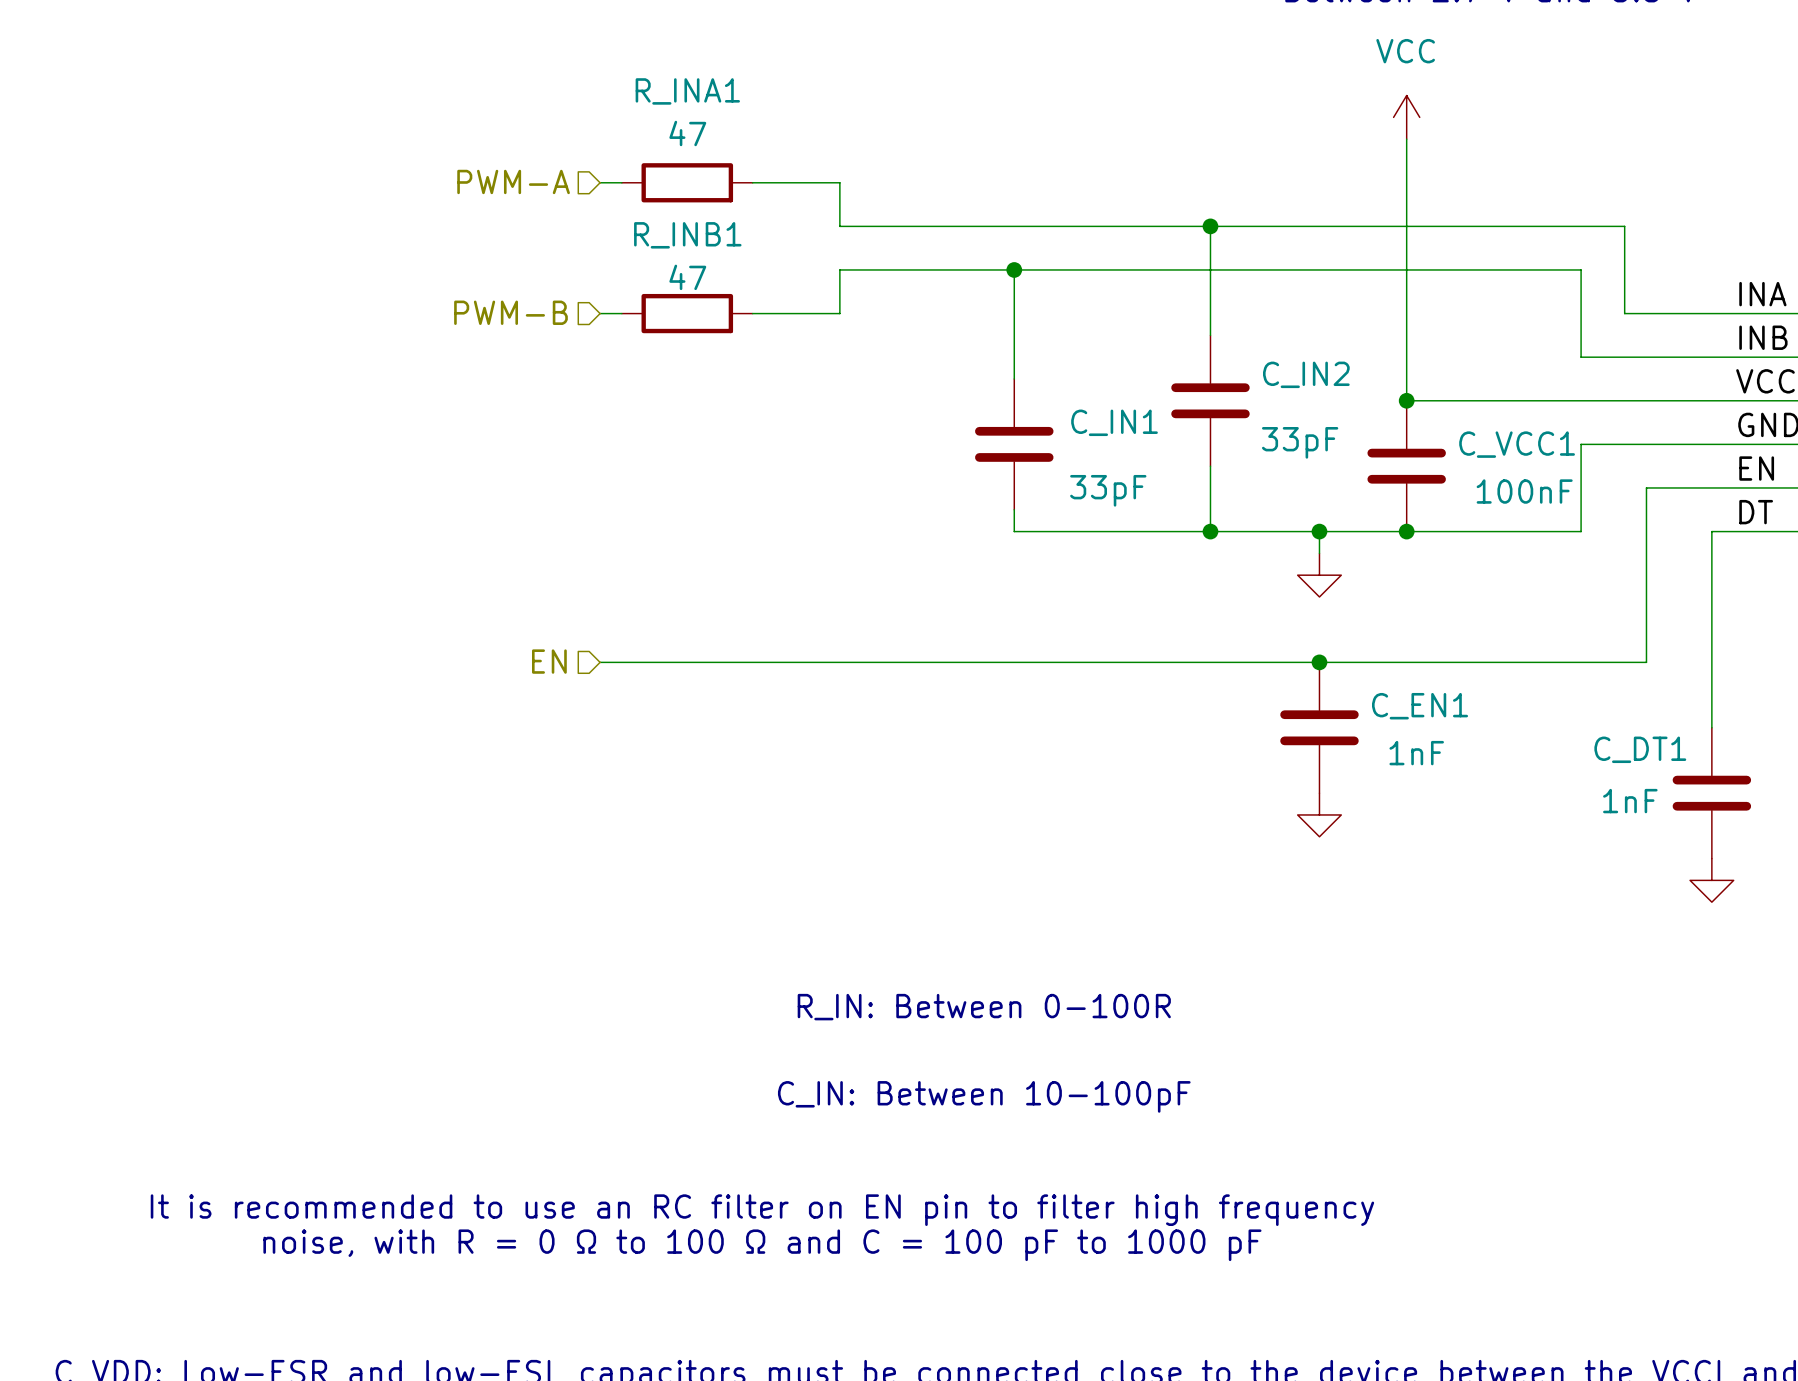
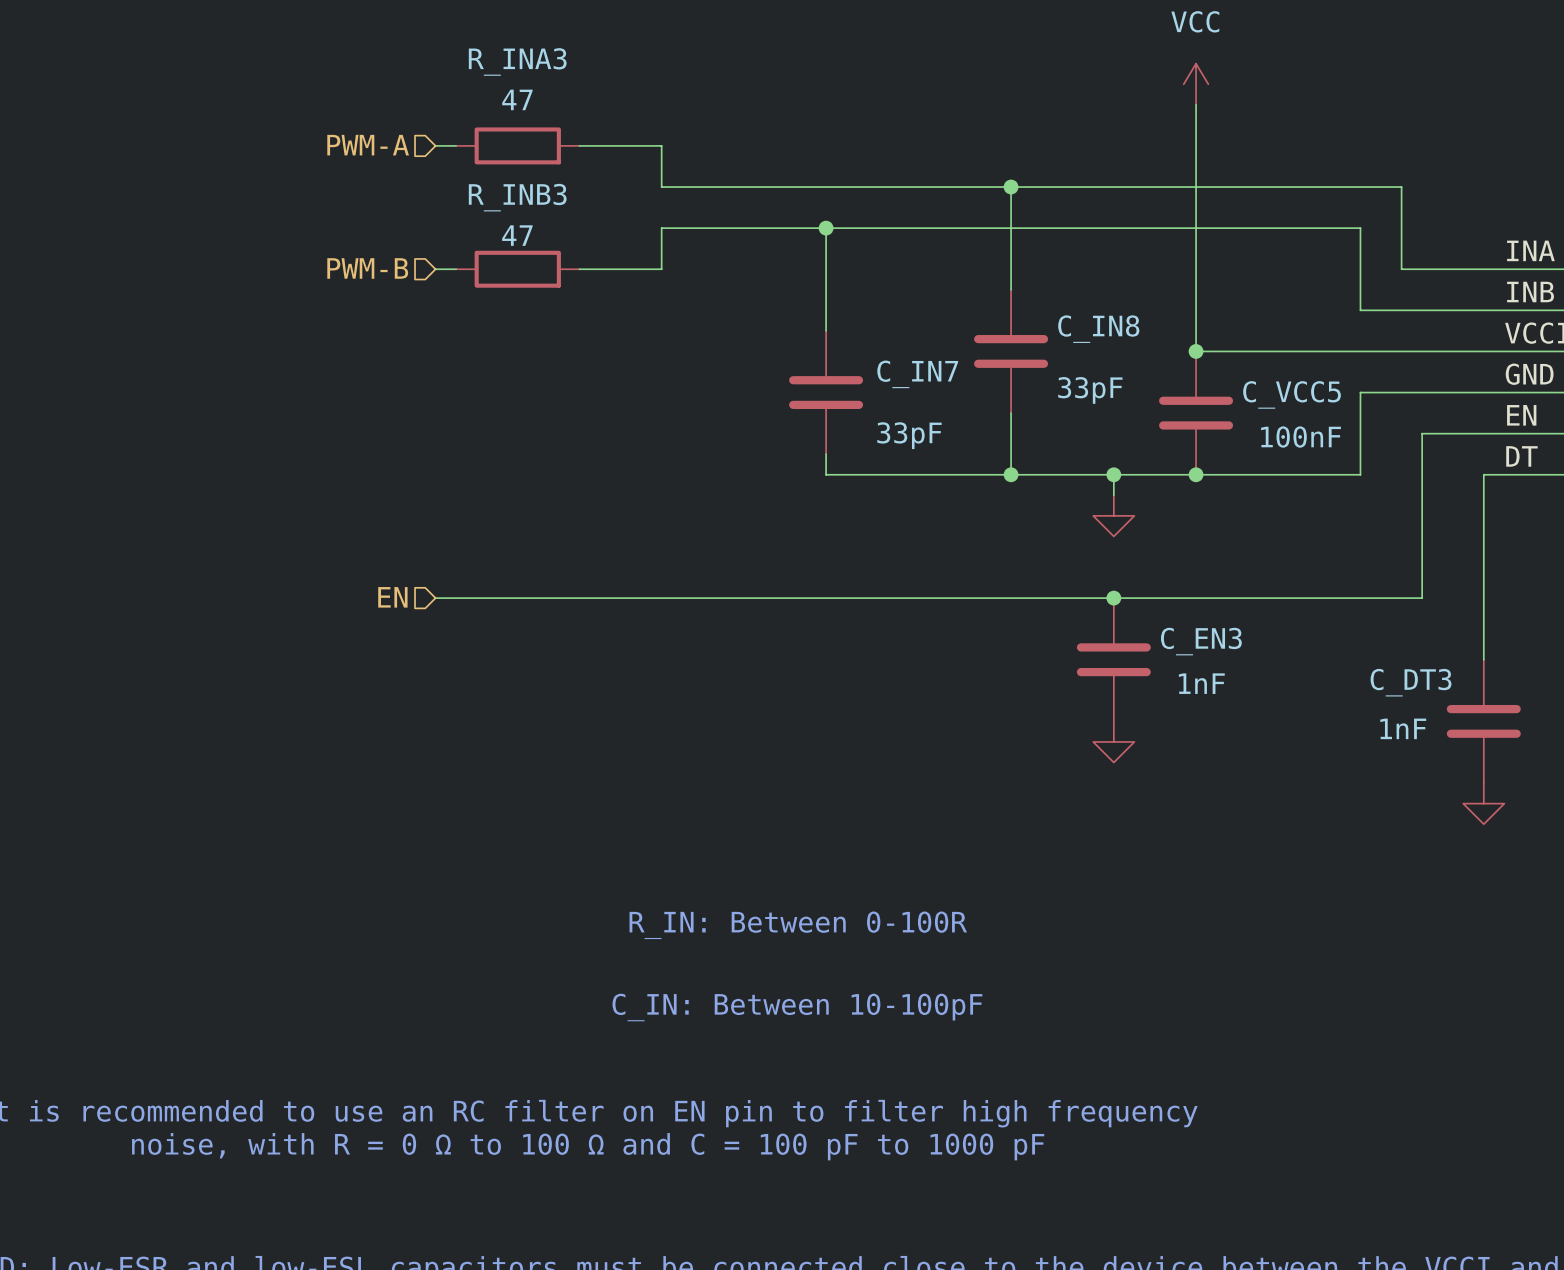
R_INA1 name: R_INA1 (687, 91) -> R_INA3 (517, 61)
R_INB1 name: R_INB1 (687, 235) -> R_INB3 (517, 197)
C_IN2 name: C_IN2 (1306, 374) -> C_IN8 (1098, 329)
C_IN1 name: C_IN1 (1114, 422) -> C_IN7 (917, 374)
C_VCC1 name: C_VCC1 (1517, 444) -> C_VCC5 (1292, 394)
C_EN1 name: C_EN1 (1420, 706) -> C_EN3 (1201, 641)
C_DT1 name: C_DT1 (1640, 749) -> C_DT3 (1411, 682)

